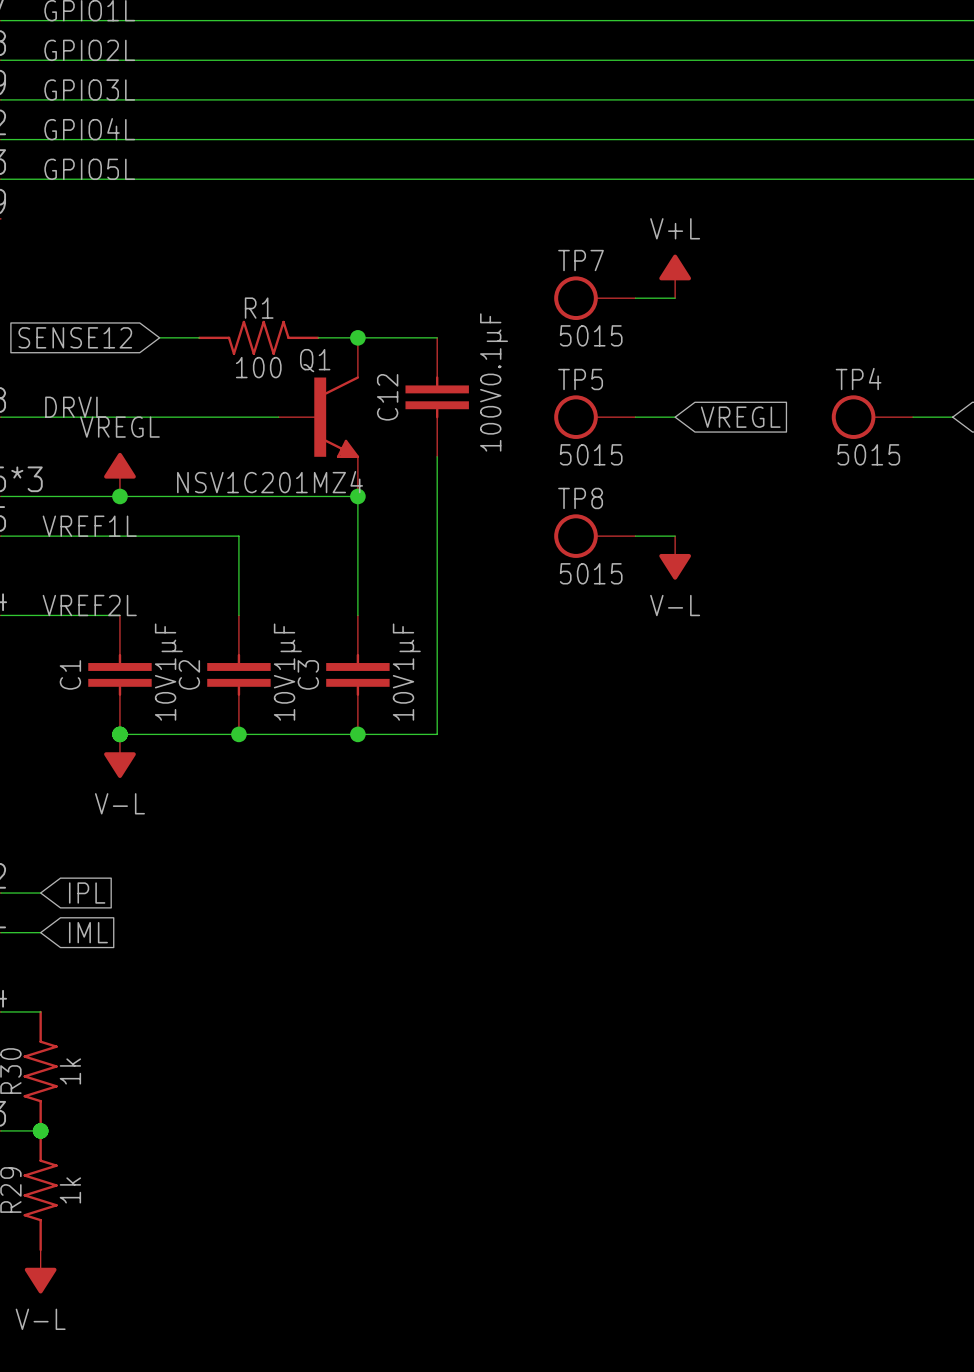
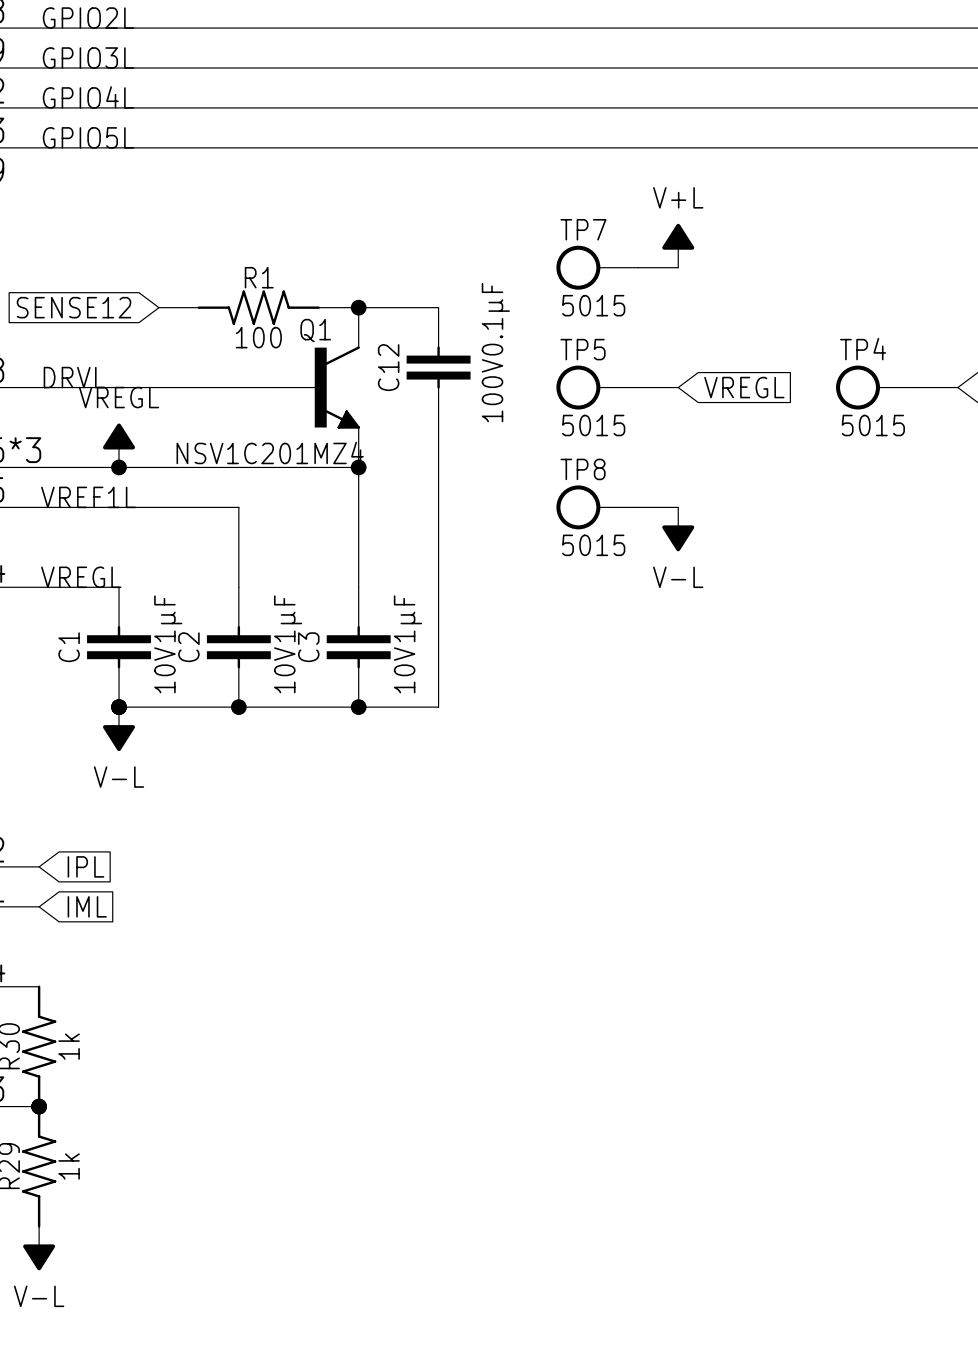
label: VREF2L (89, 605) -> VREGL (81, 577)

